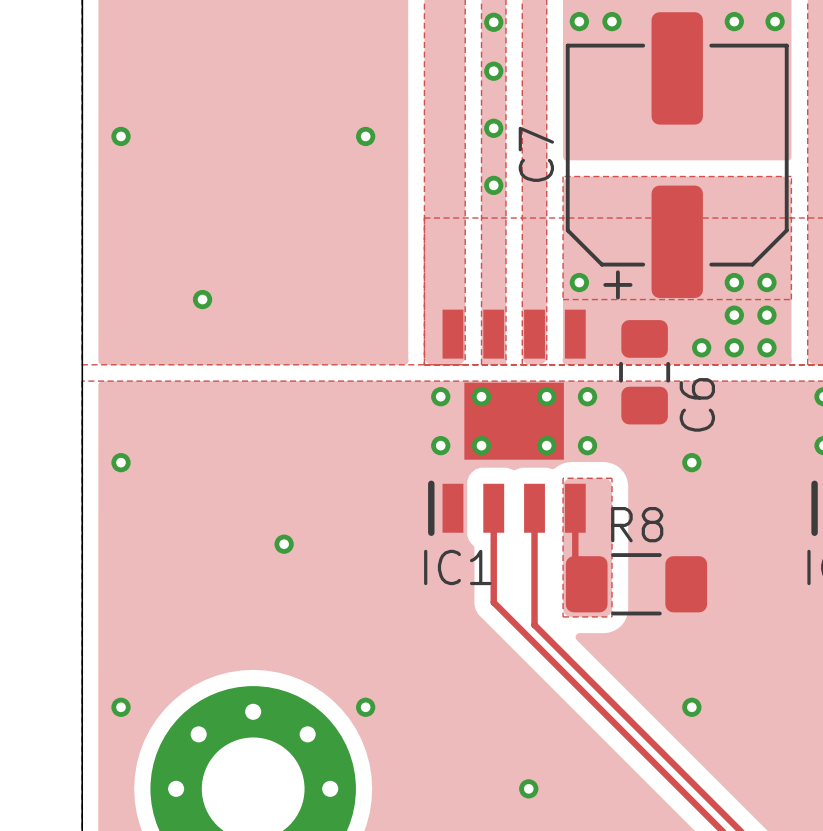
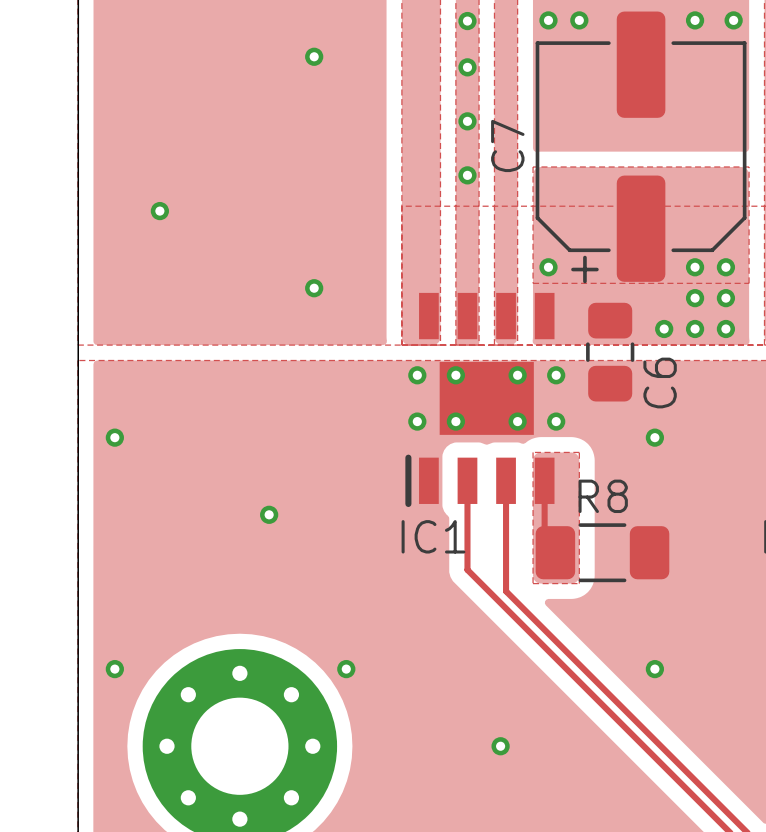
via: none -> (314, 56)
via: (121, 136) -> none
via: (365, 136) -> none
via: none -> (159, 211)
via: (202, 299) -> none
via: none -> (314, 288)

